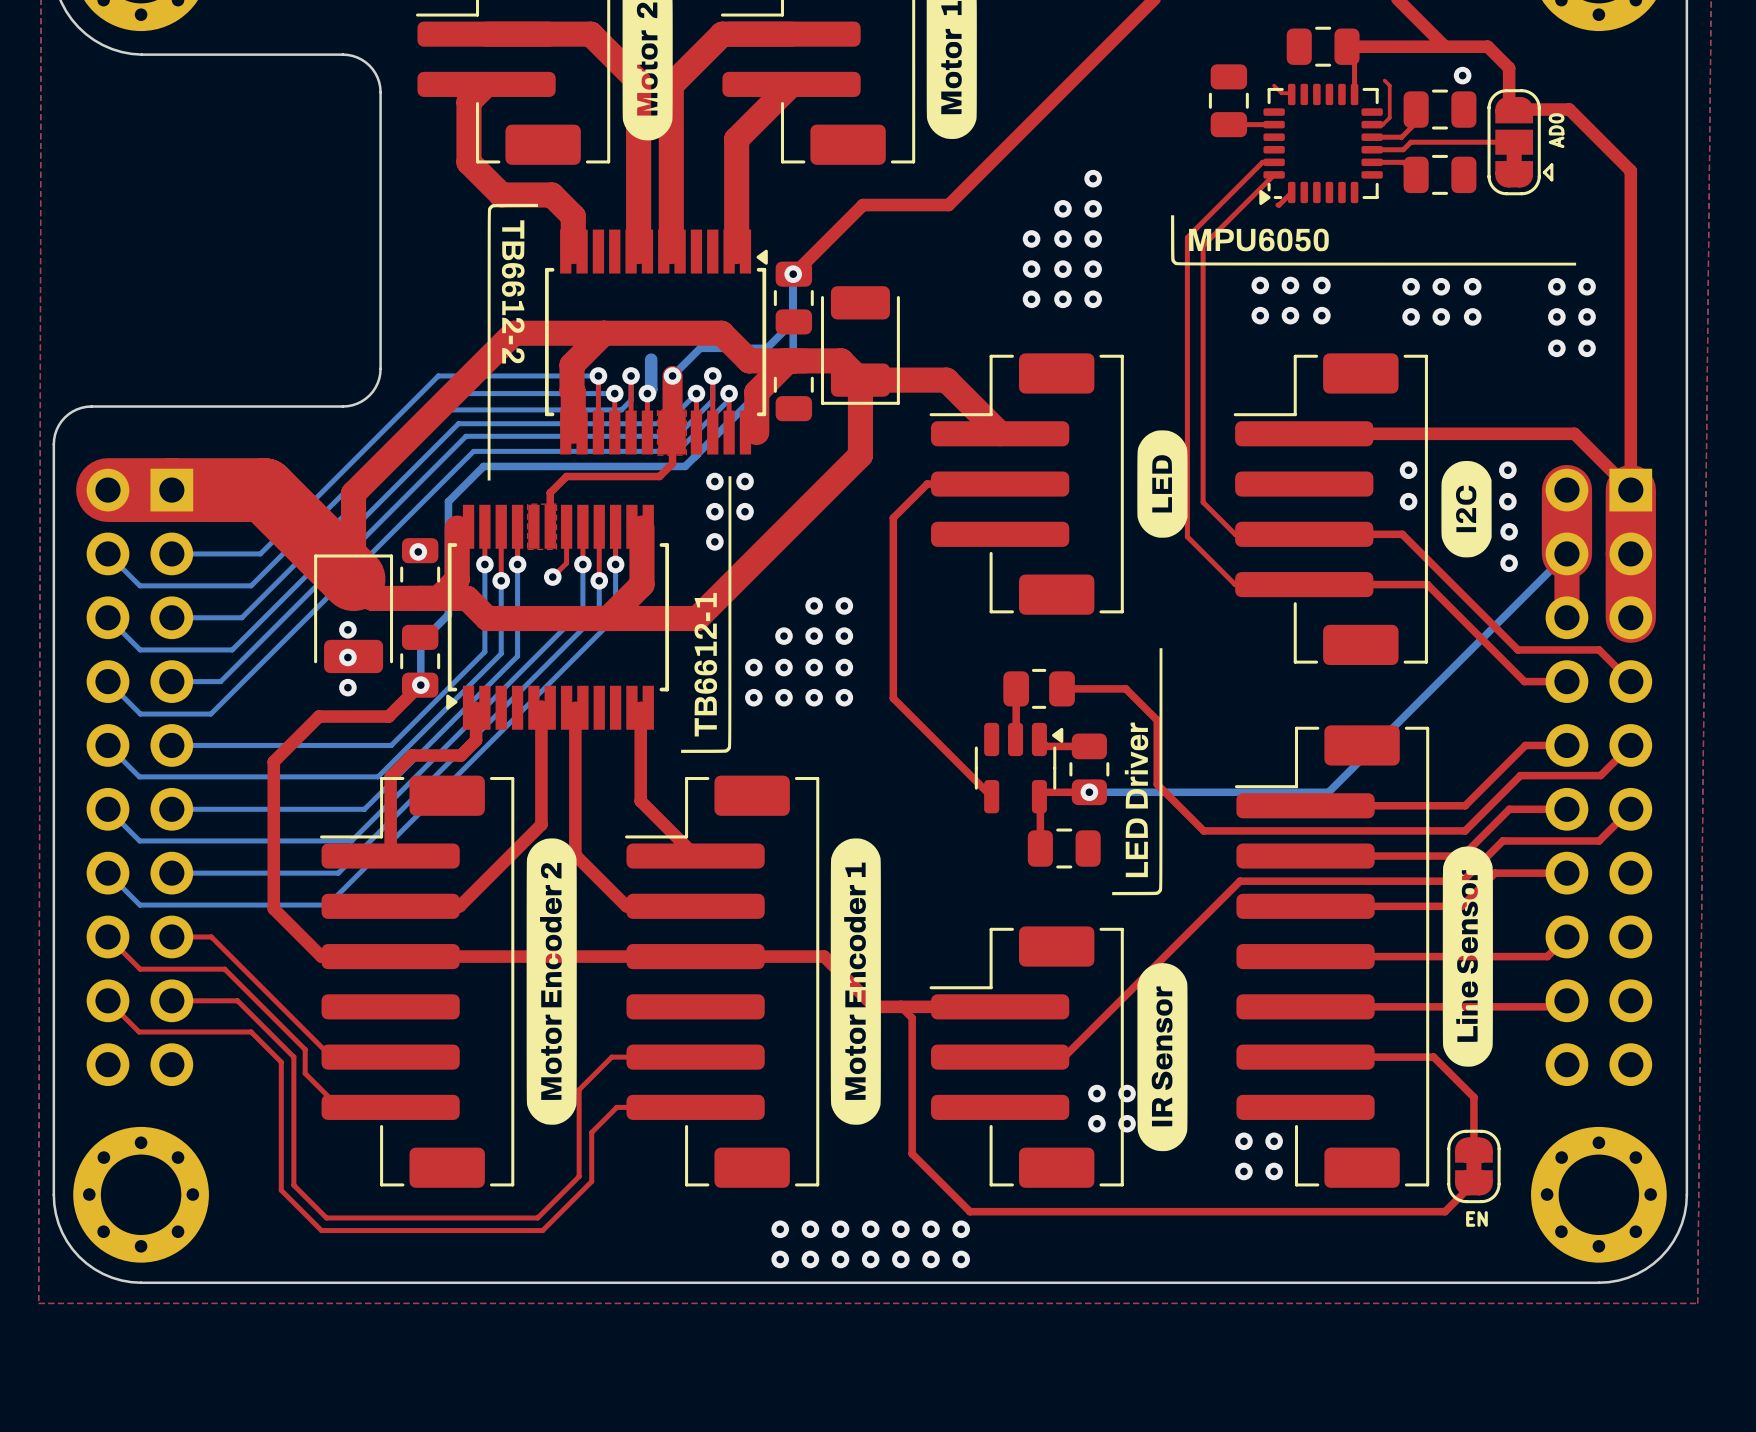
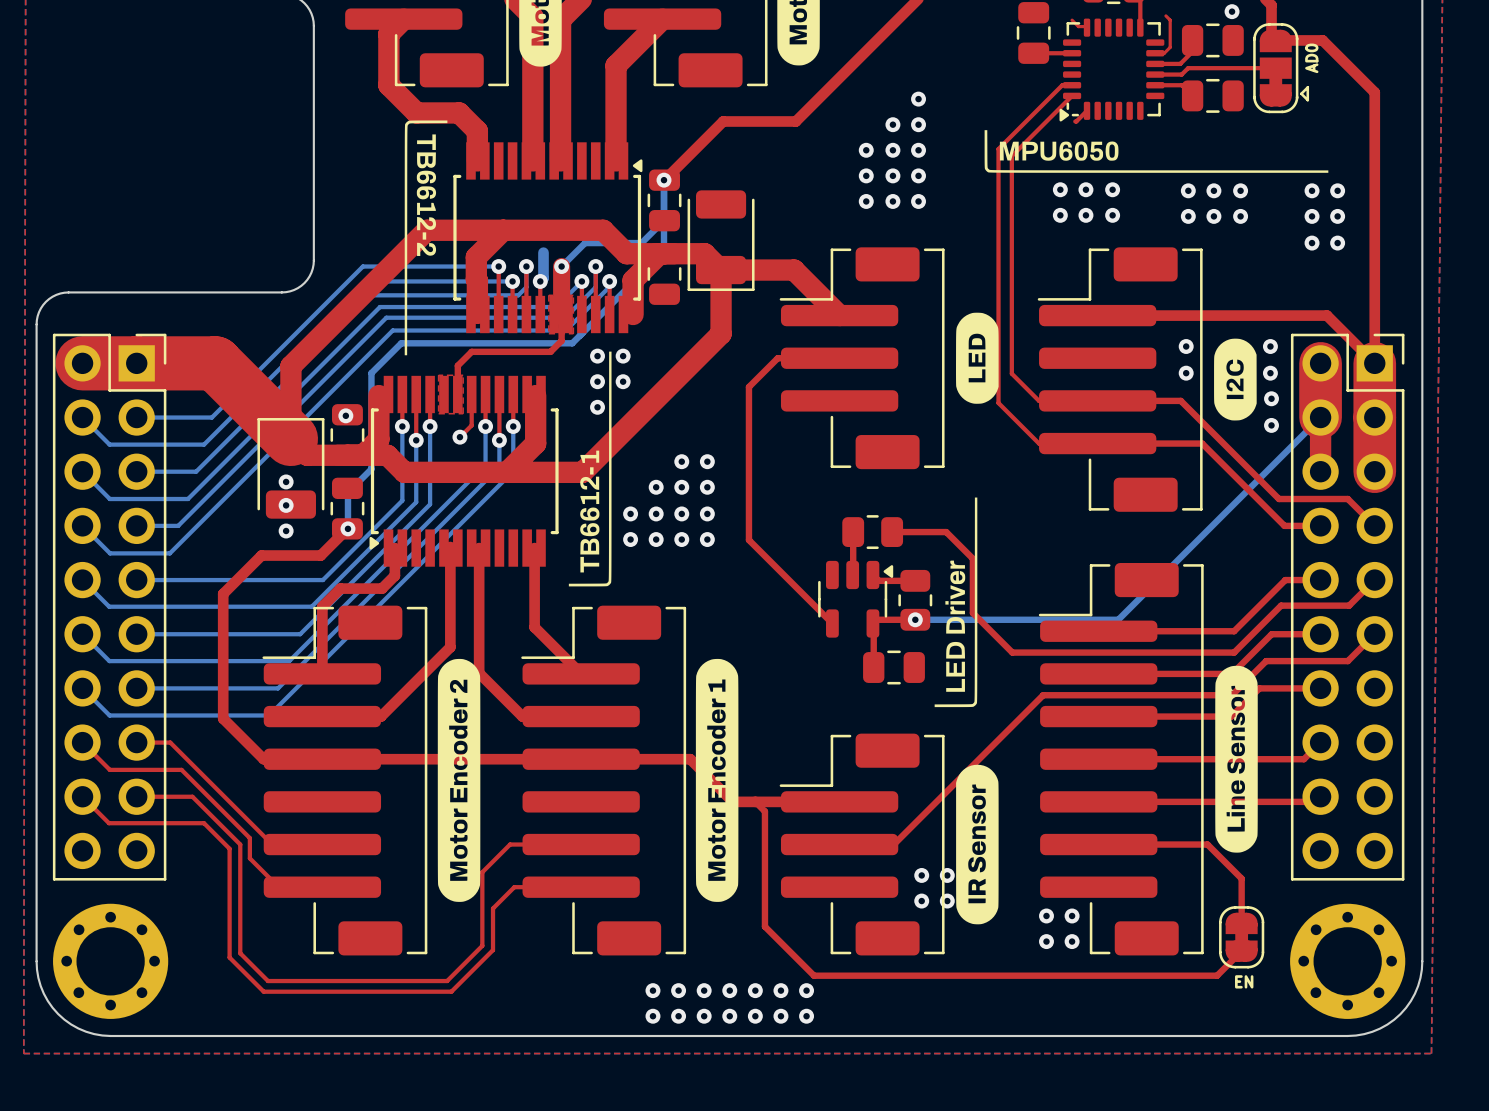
part footprint: [86, 468, 194, 1087] -> [52, 333, 167, 881]
part footprint: [1545, 468, 1653, 1087] -> [1290, 333, 1405, 881]

